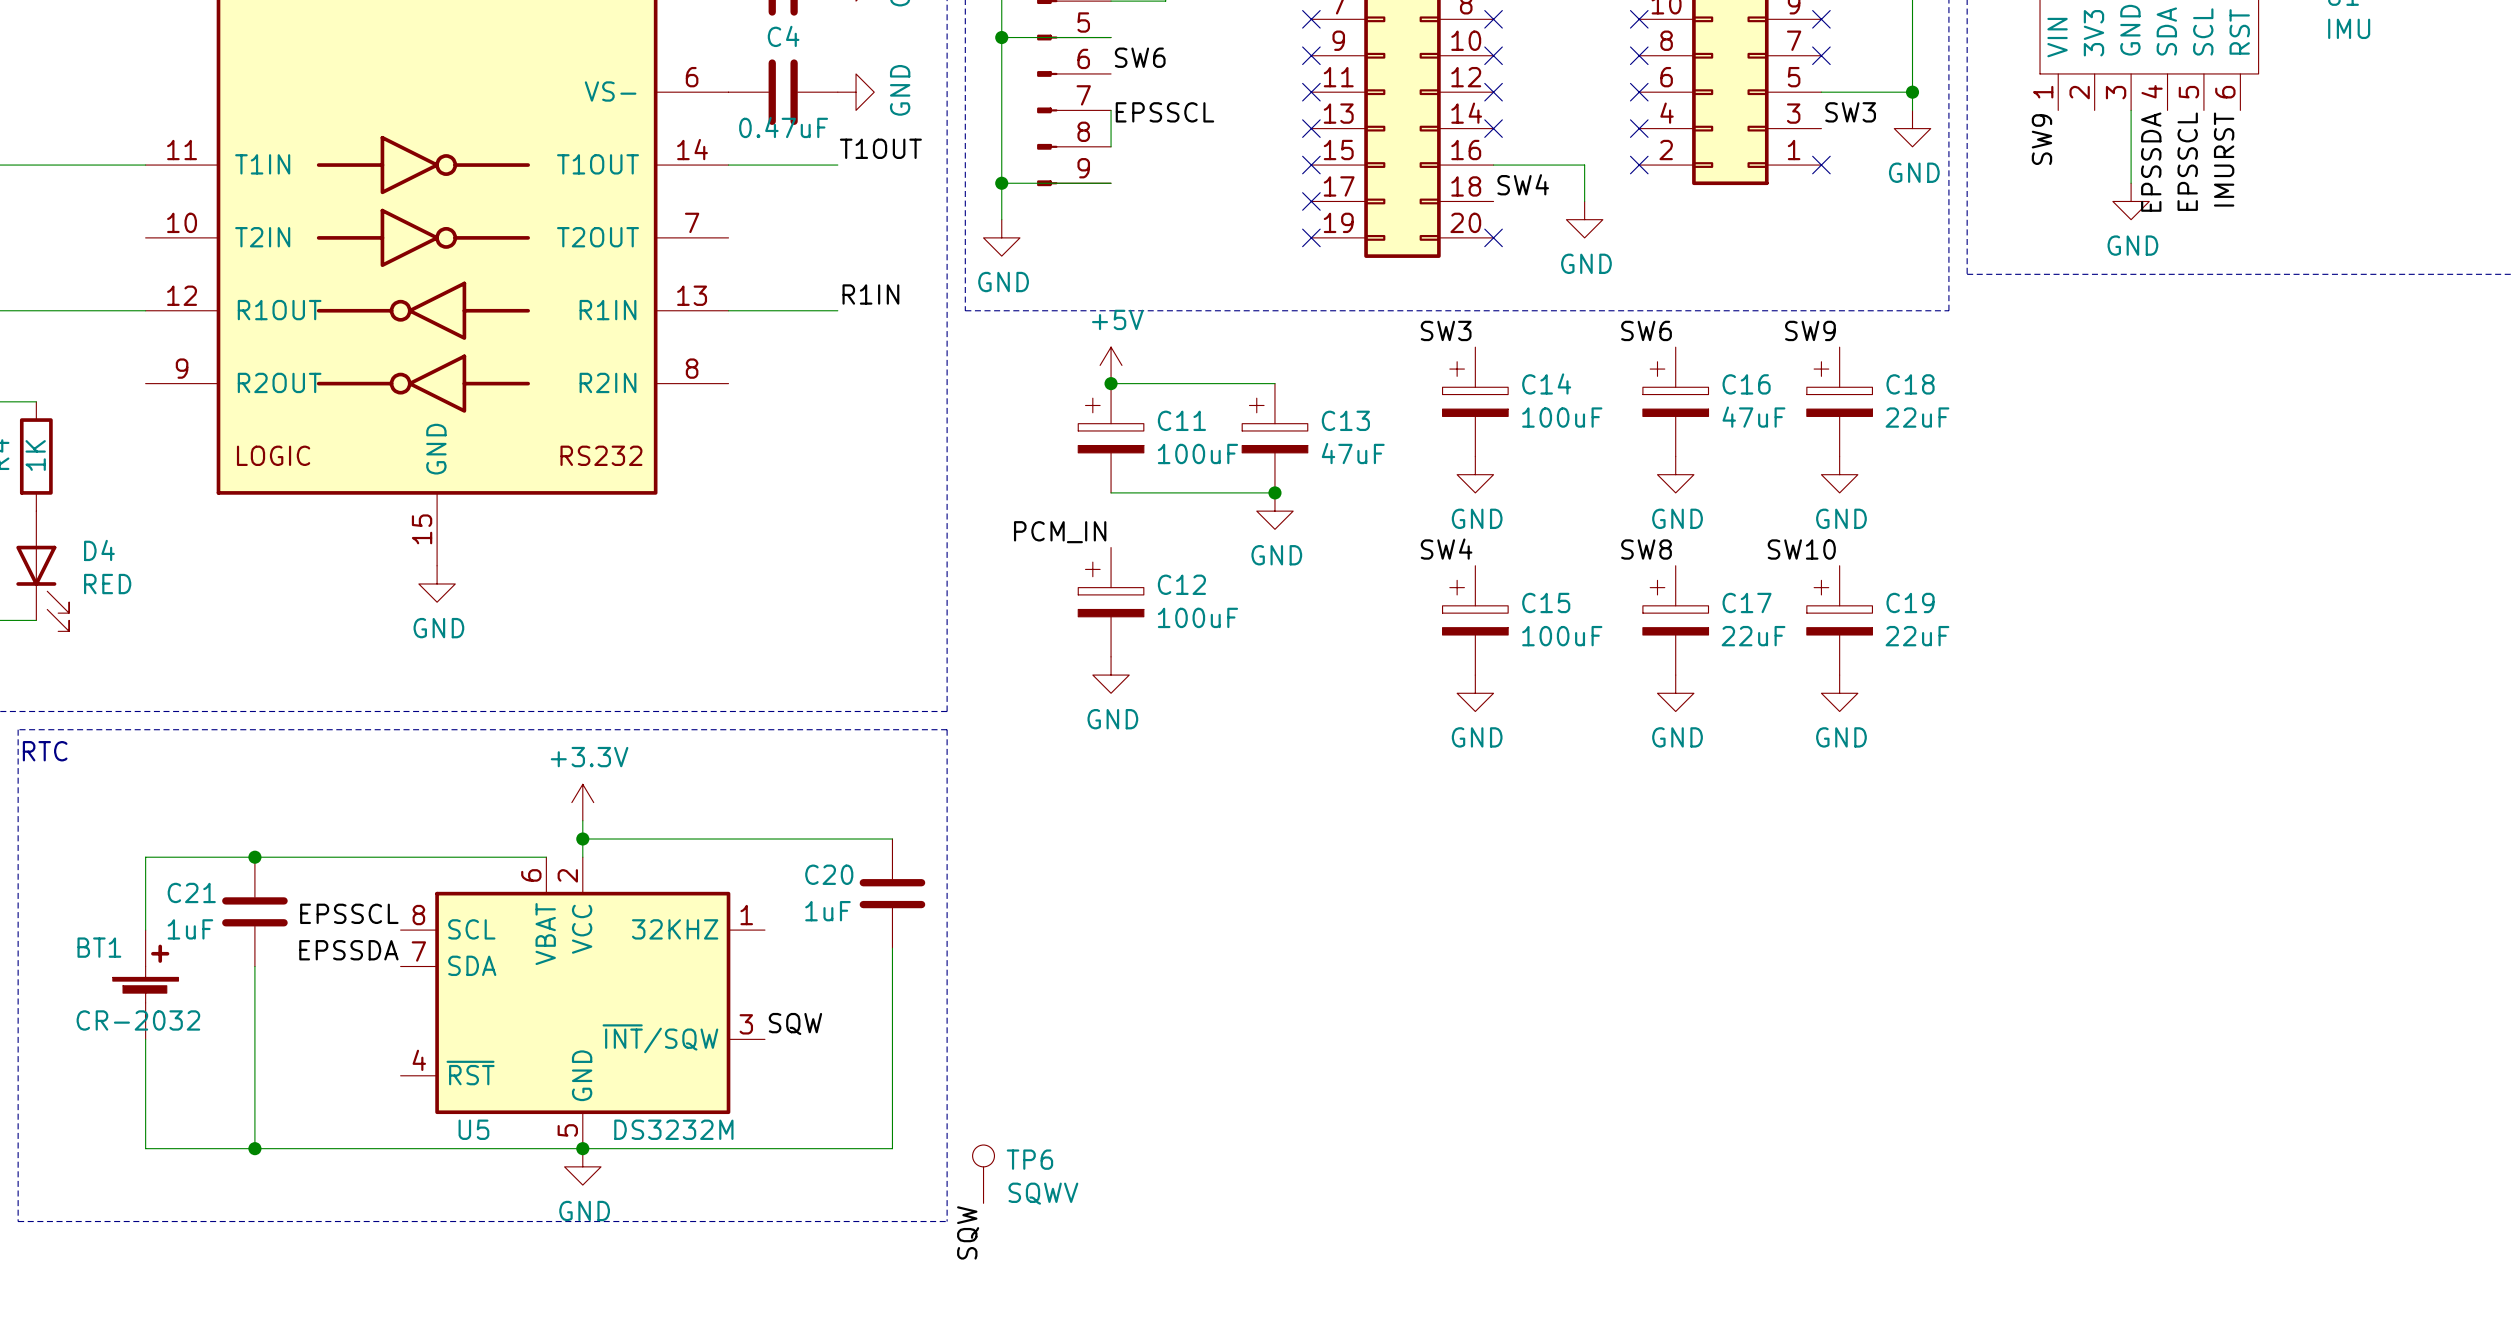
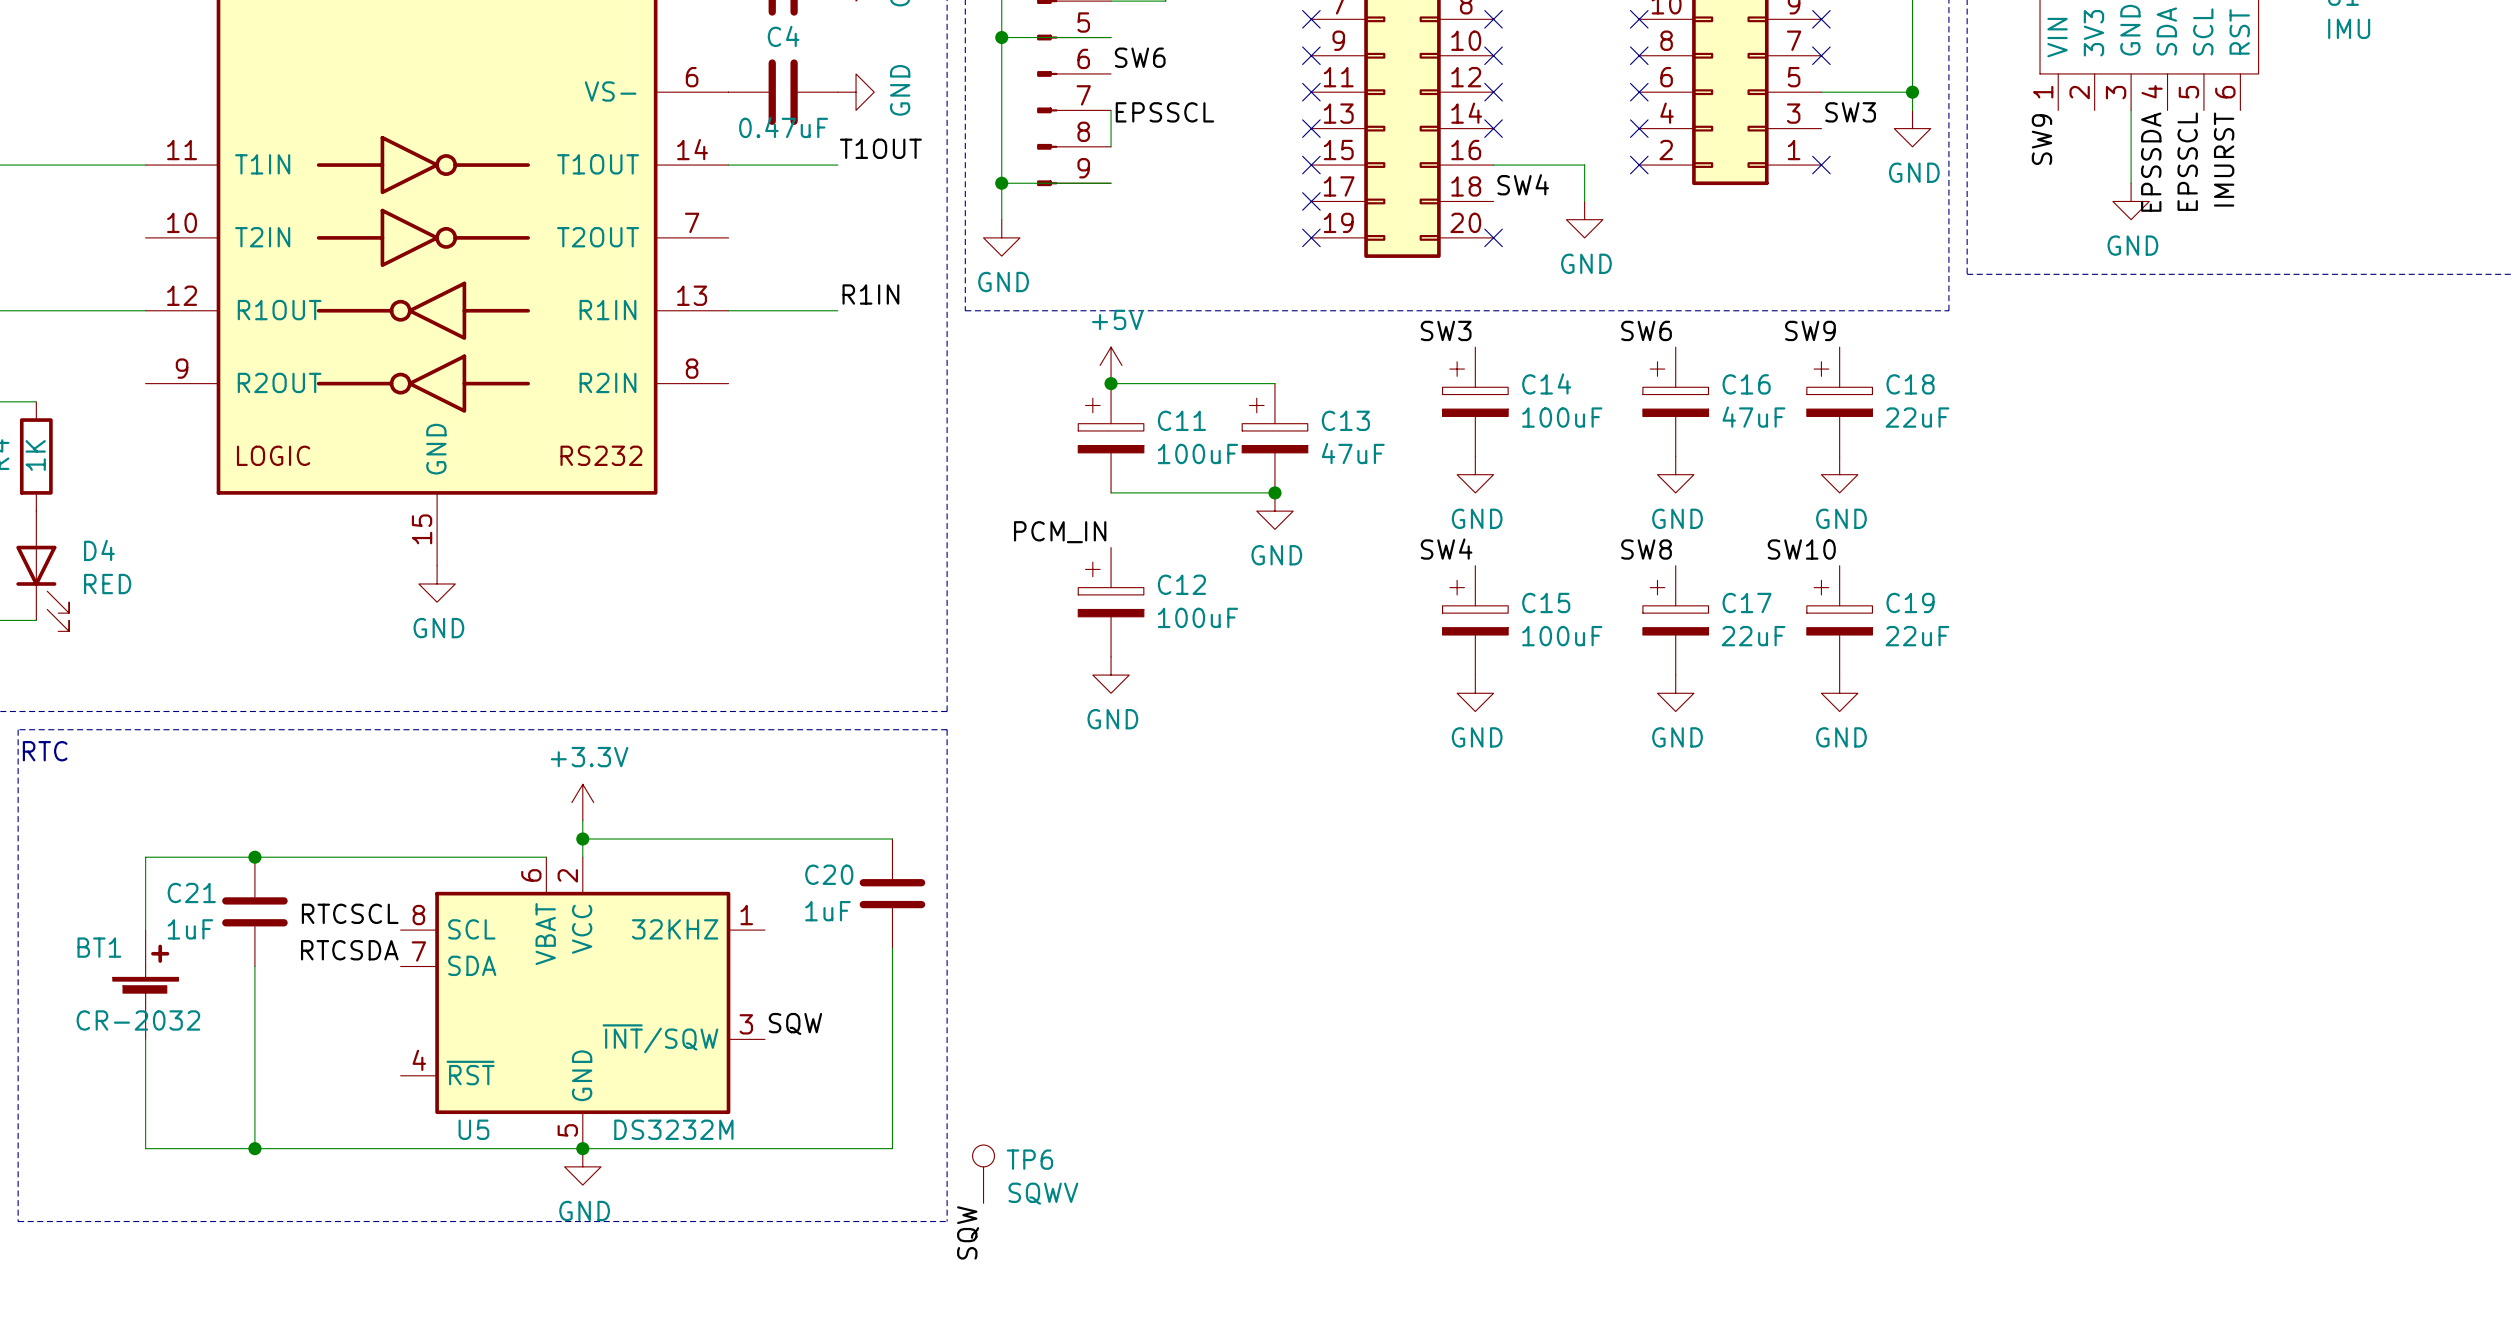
label: EPSSCL (349, 913) -> RTCSCL (350, 913)
label: EPSSDA (348, 950) -> RTCSDA (349, 950)

